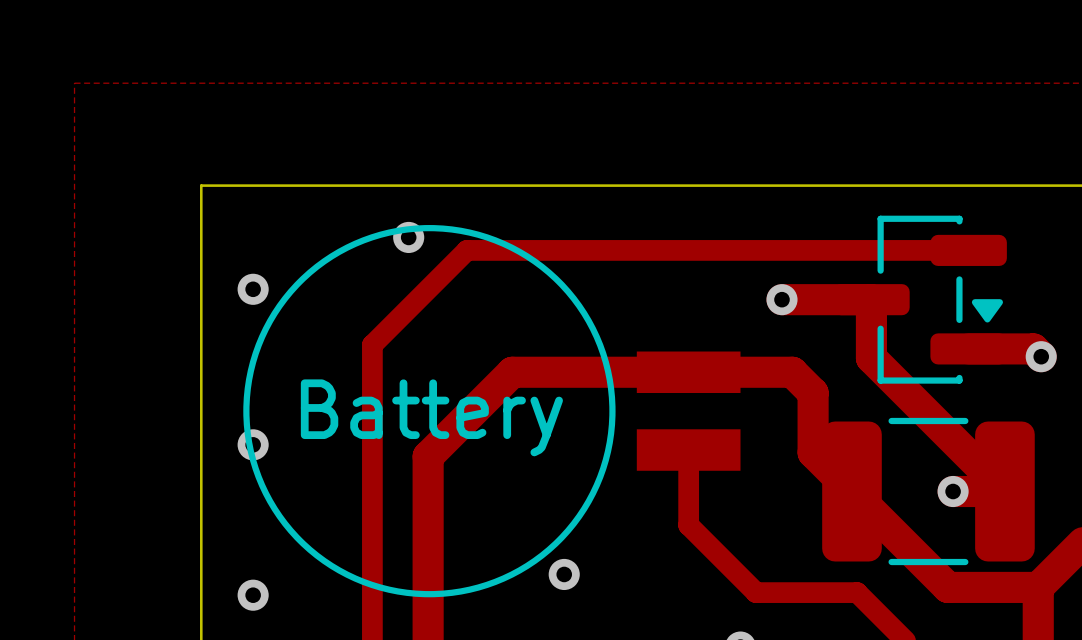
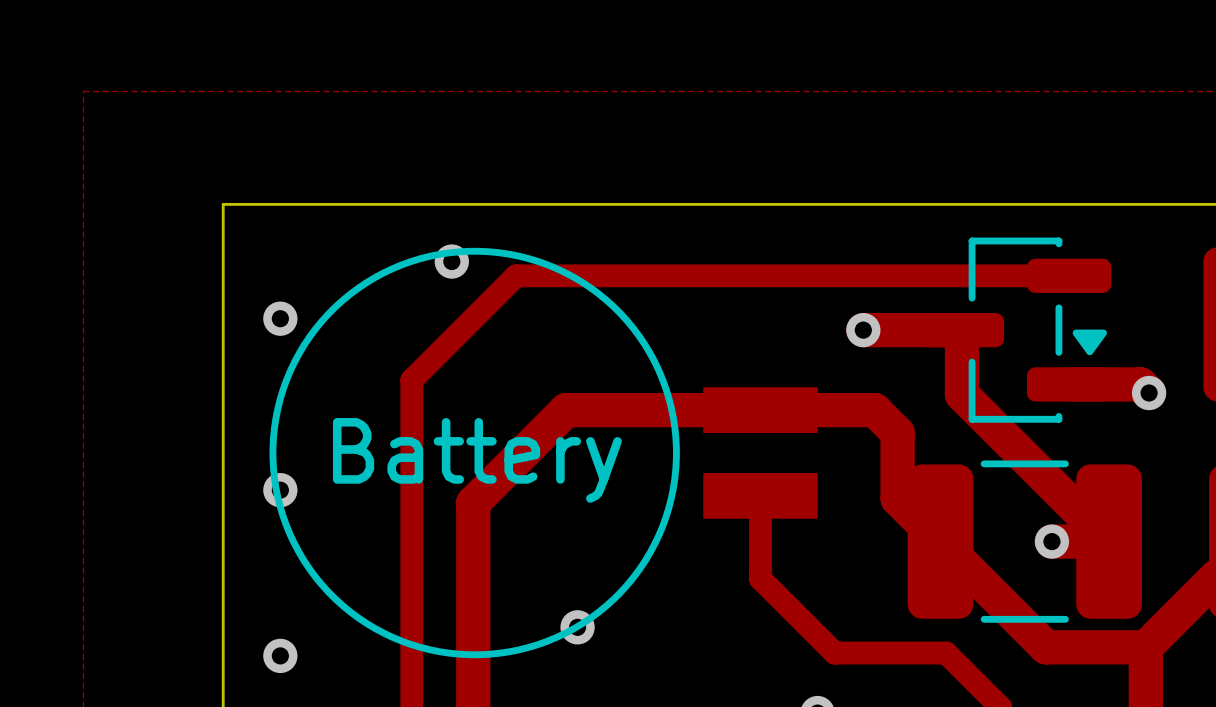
via position: (564, 574) -> (577, 627)

